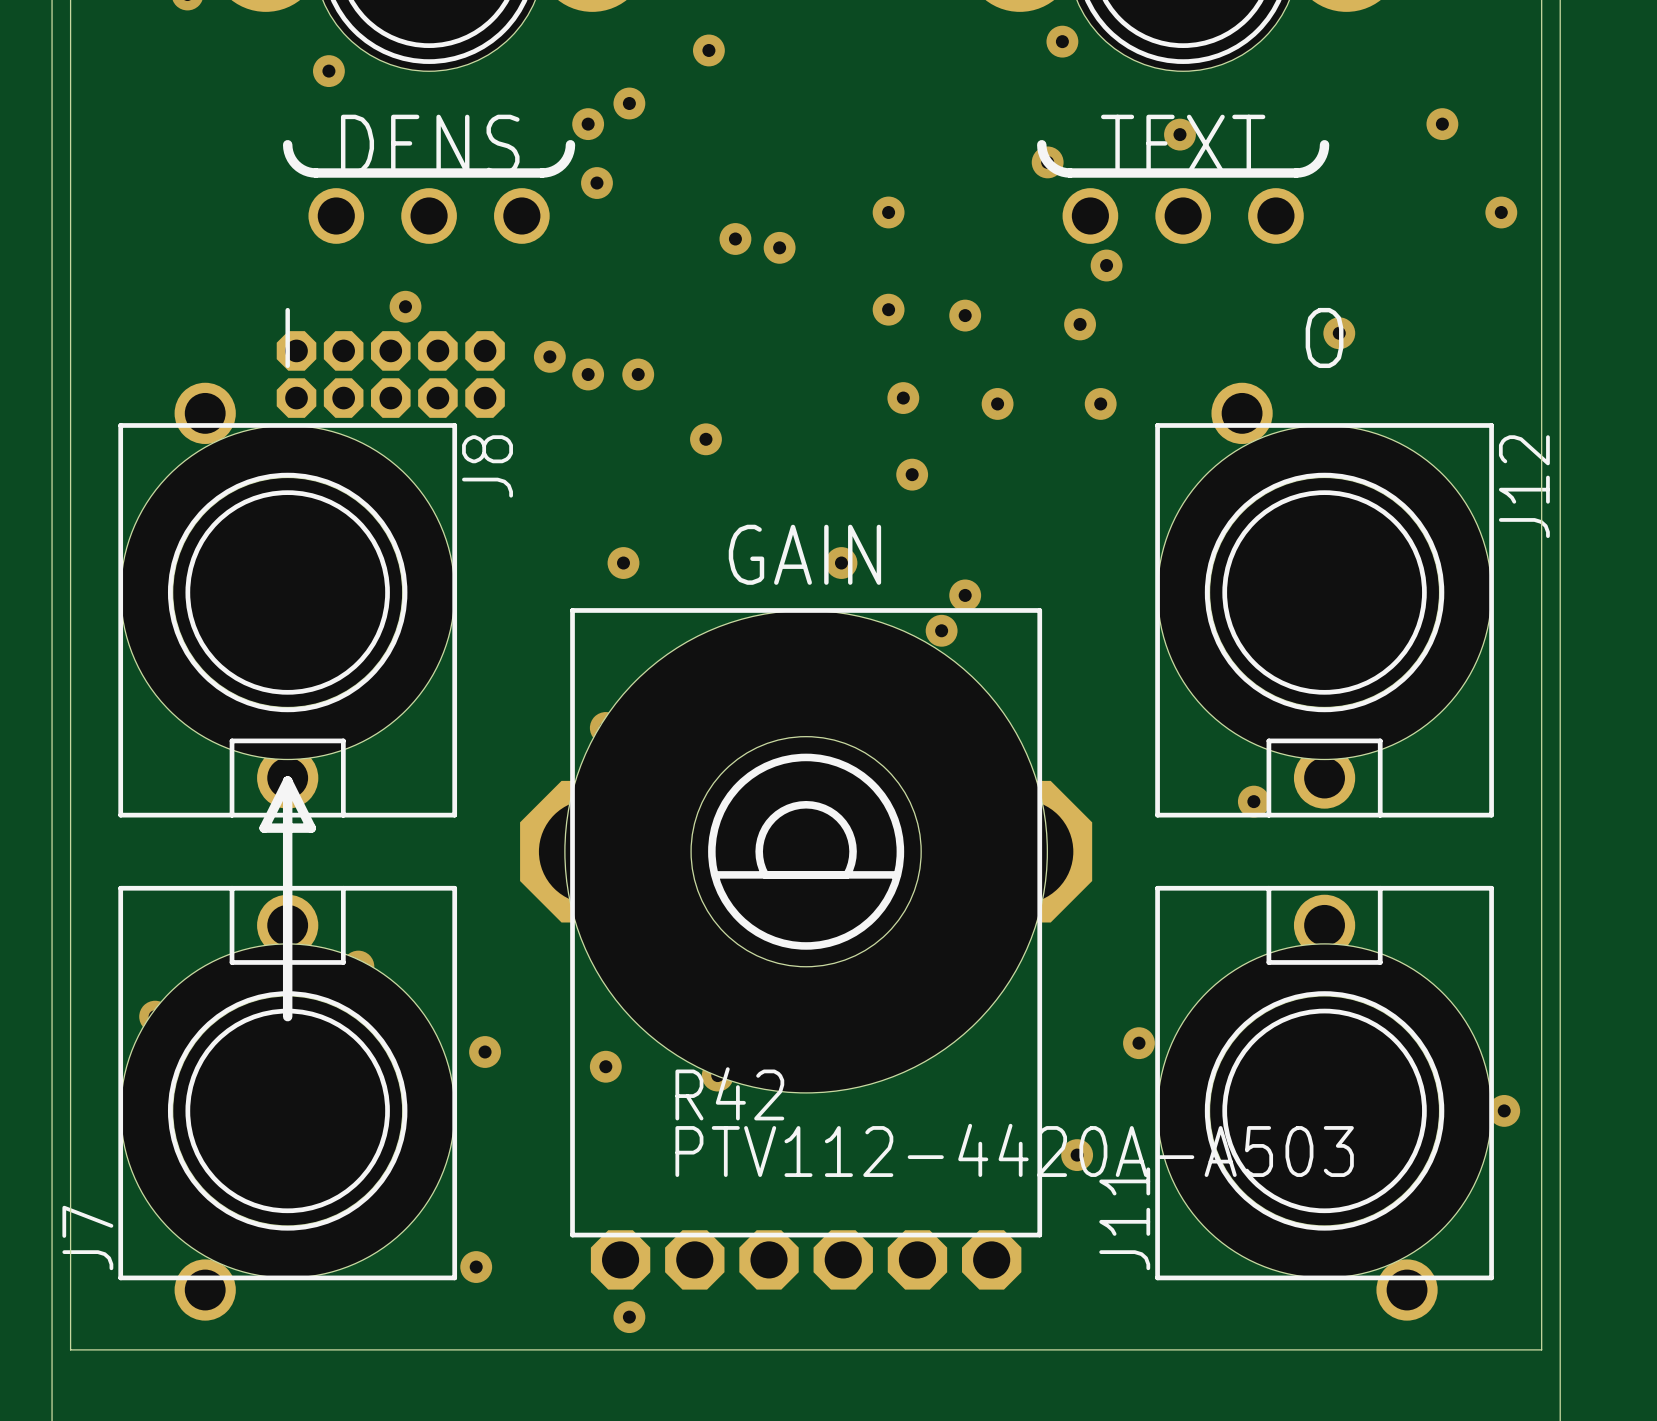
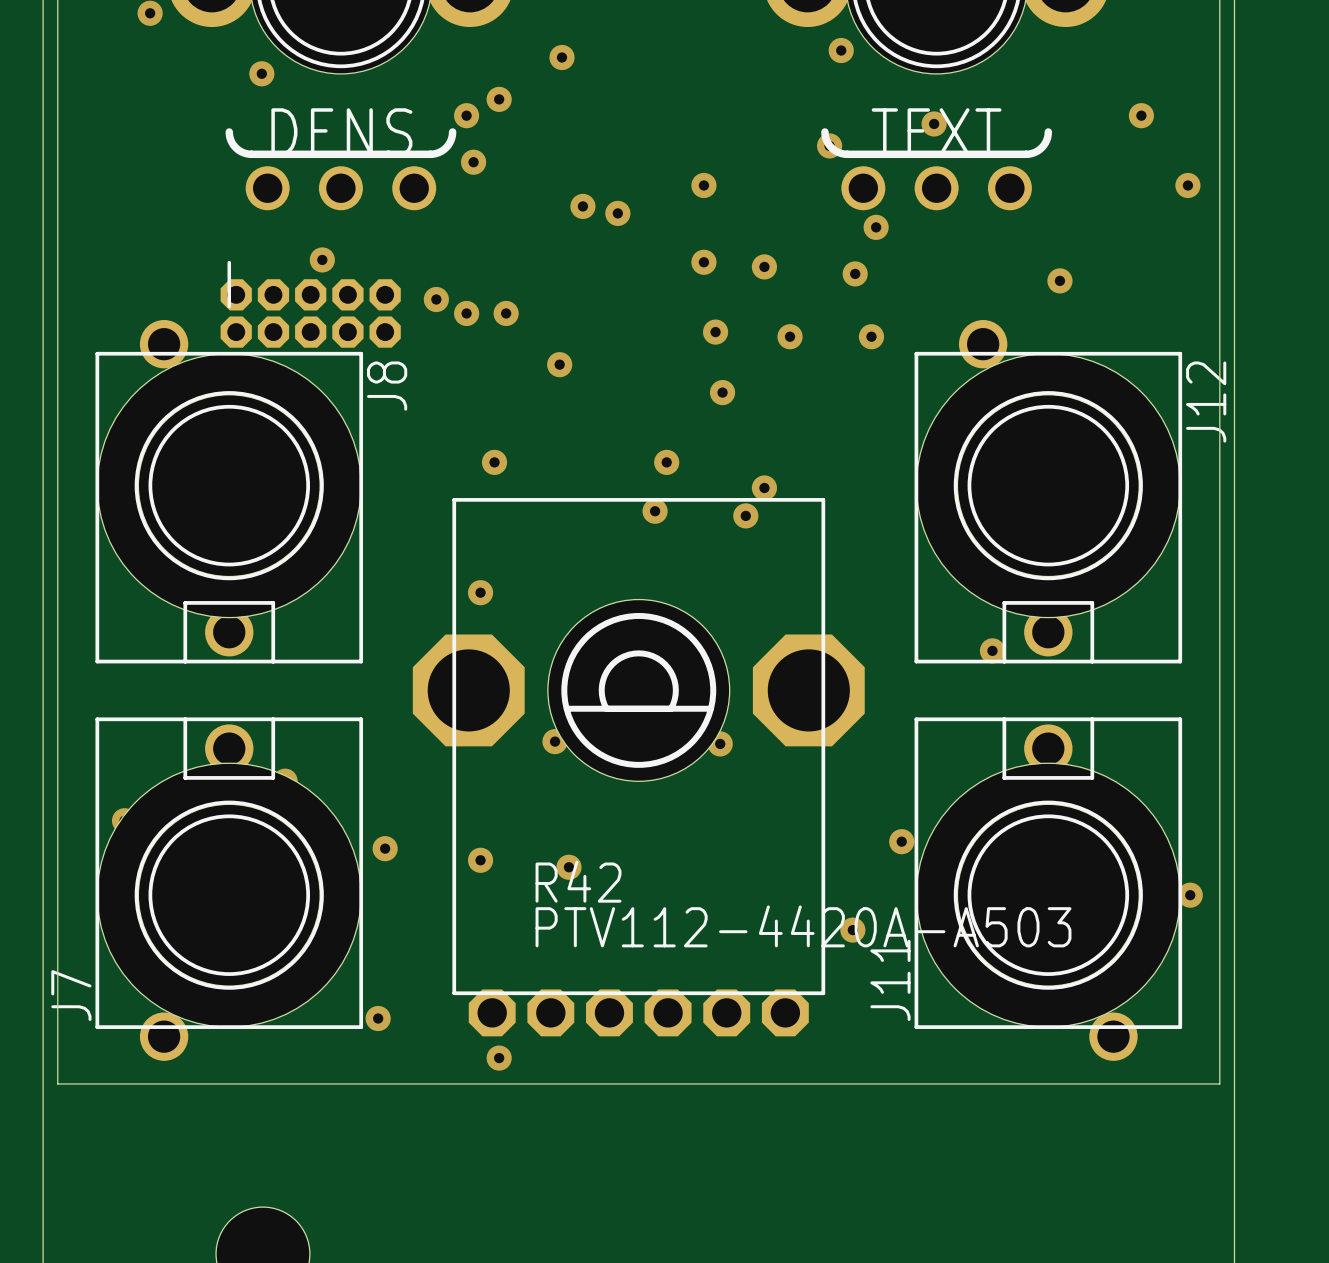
text: O (1324, 337) -> none
text: GAIN (804, 554) -> none
line: (287, 781) (287, 1016) -> none
line: (287, 781) (264, 828) (311, 828) (287, 781) -> none
hole: (806, 851) -> none

